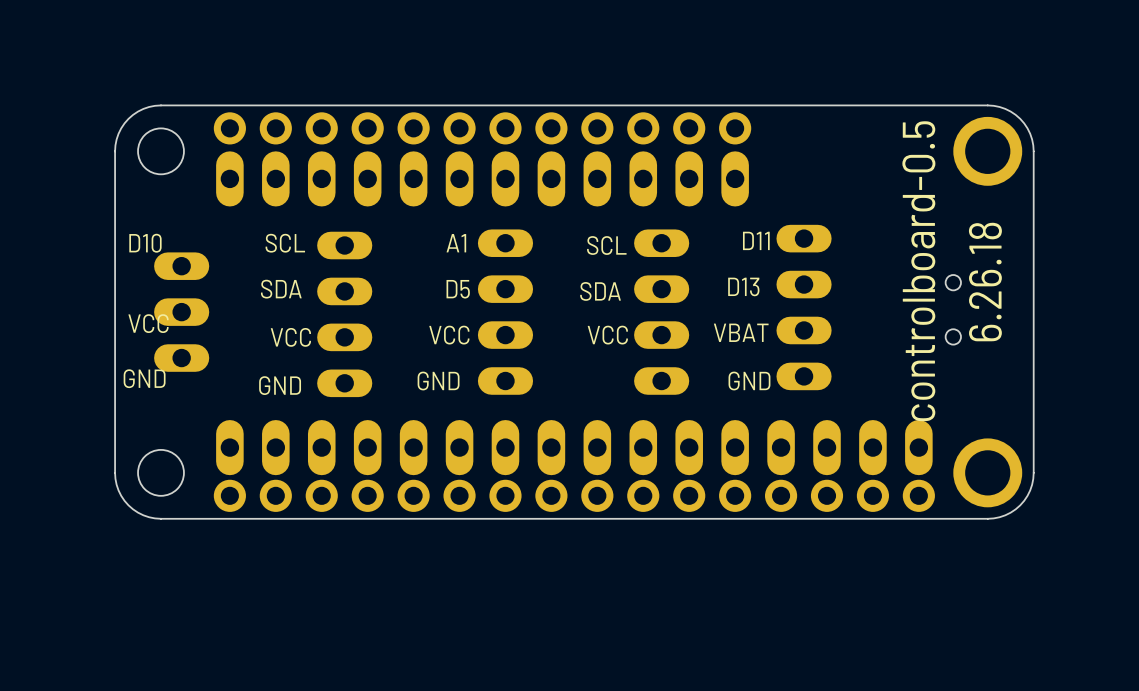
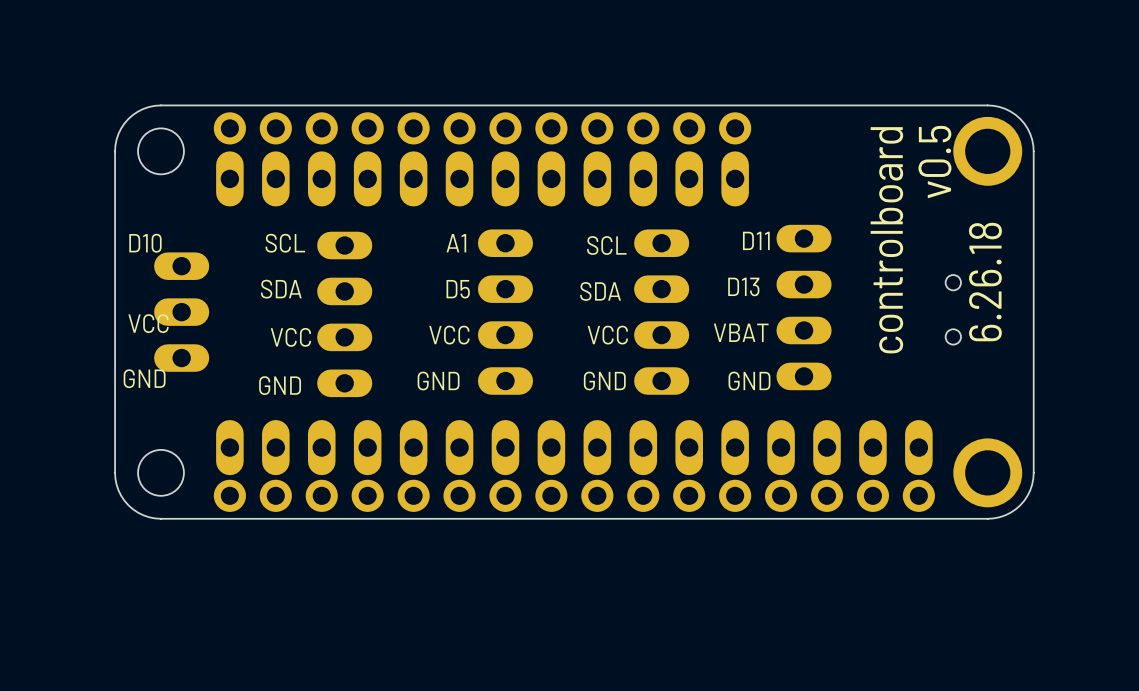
text: none -> v0.5 (934, 162)
text: controlboard-0.5 (918, 271) -> controlboard (886, 240)
text: none -> GND (604, 381)

